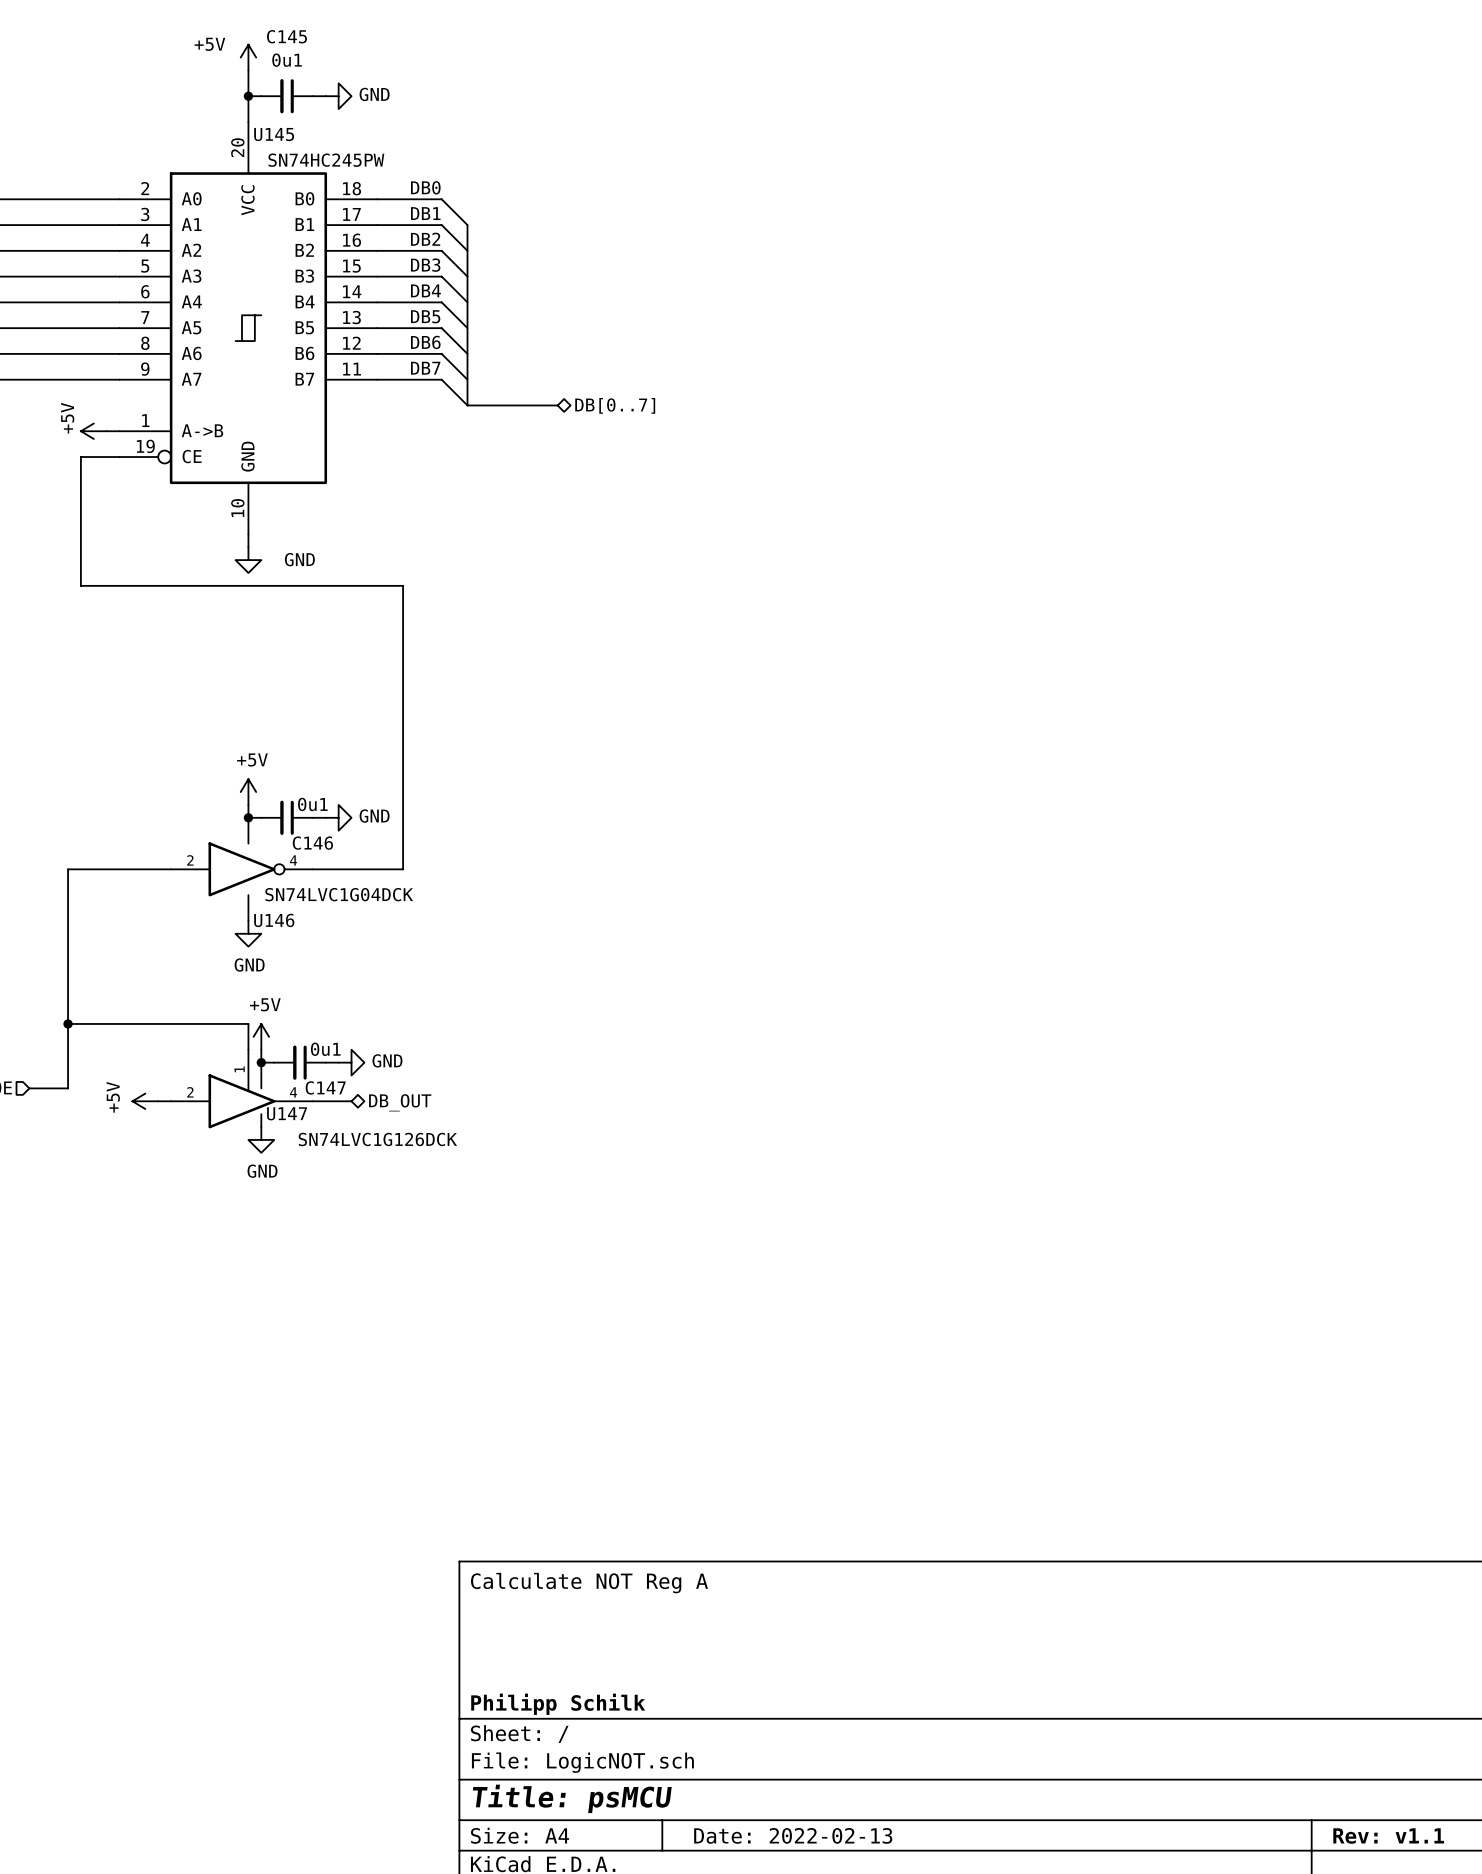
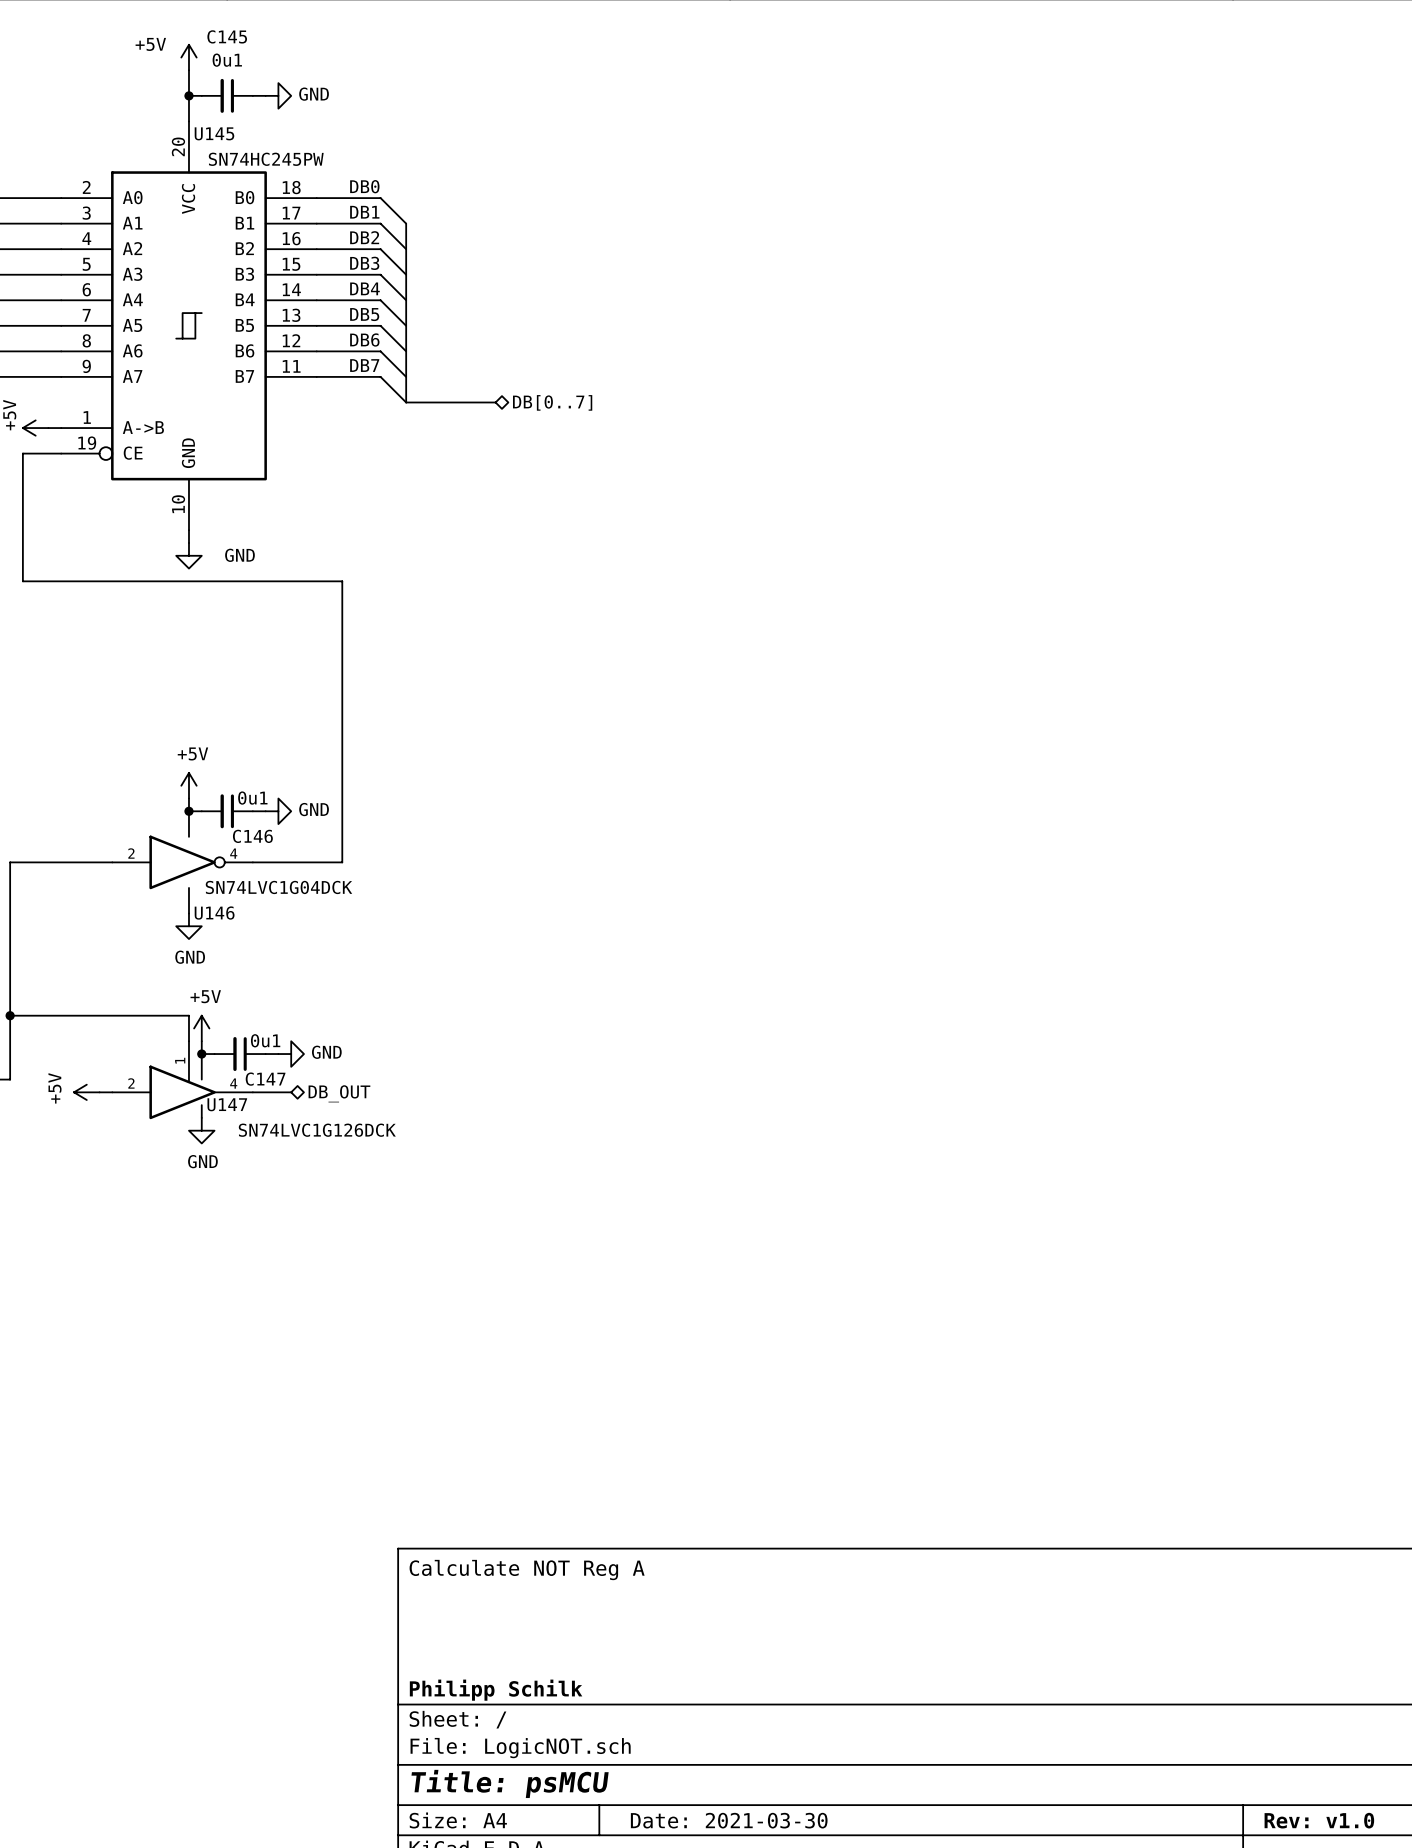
title block: Date: 2022-02-13 (793, 1835) -> Date: 2021-03-30 (729, 1820)
title block: Rev: v1.1 (1388, 1836) -> Rev: v1.0 (1319, 1820)

